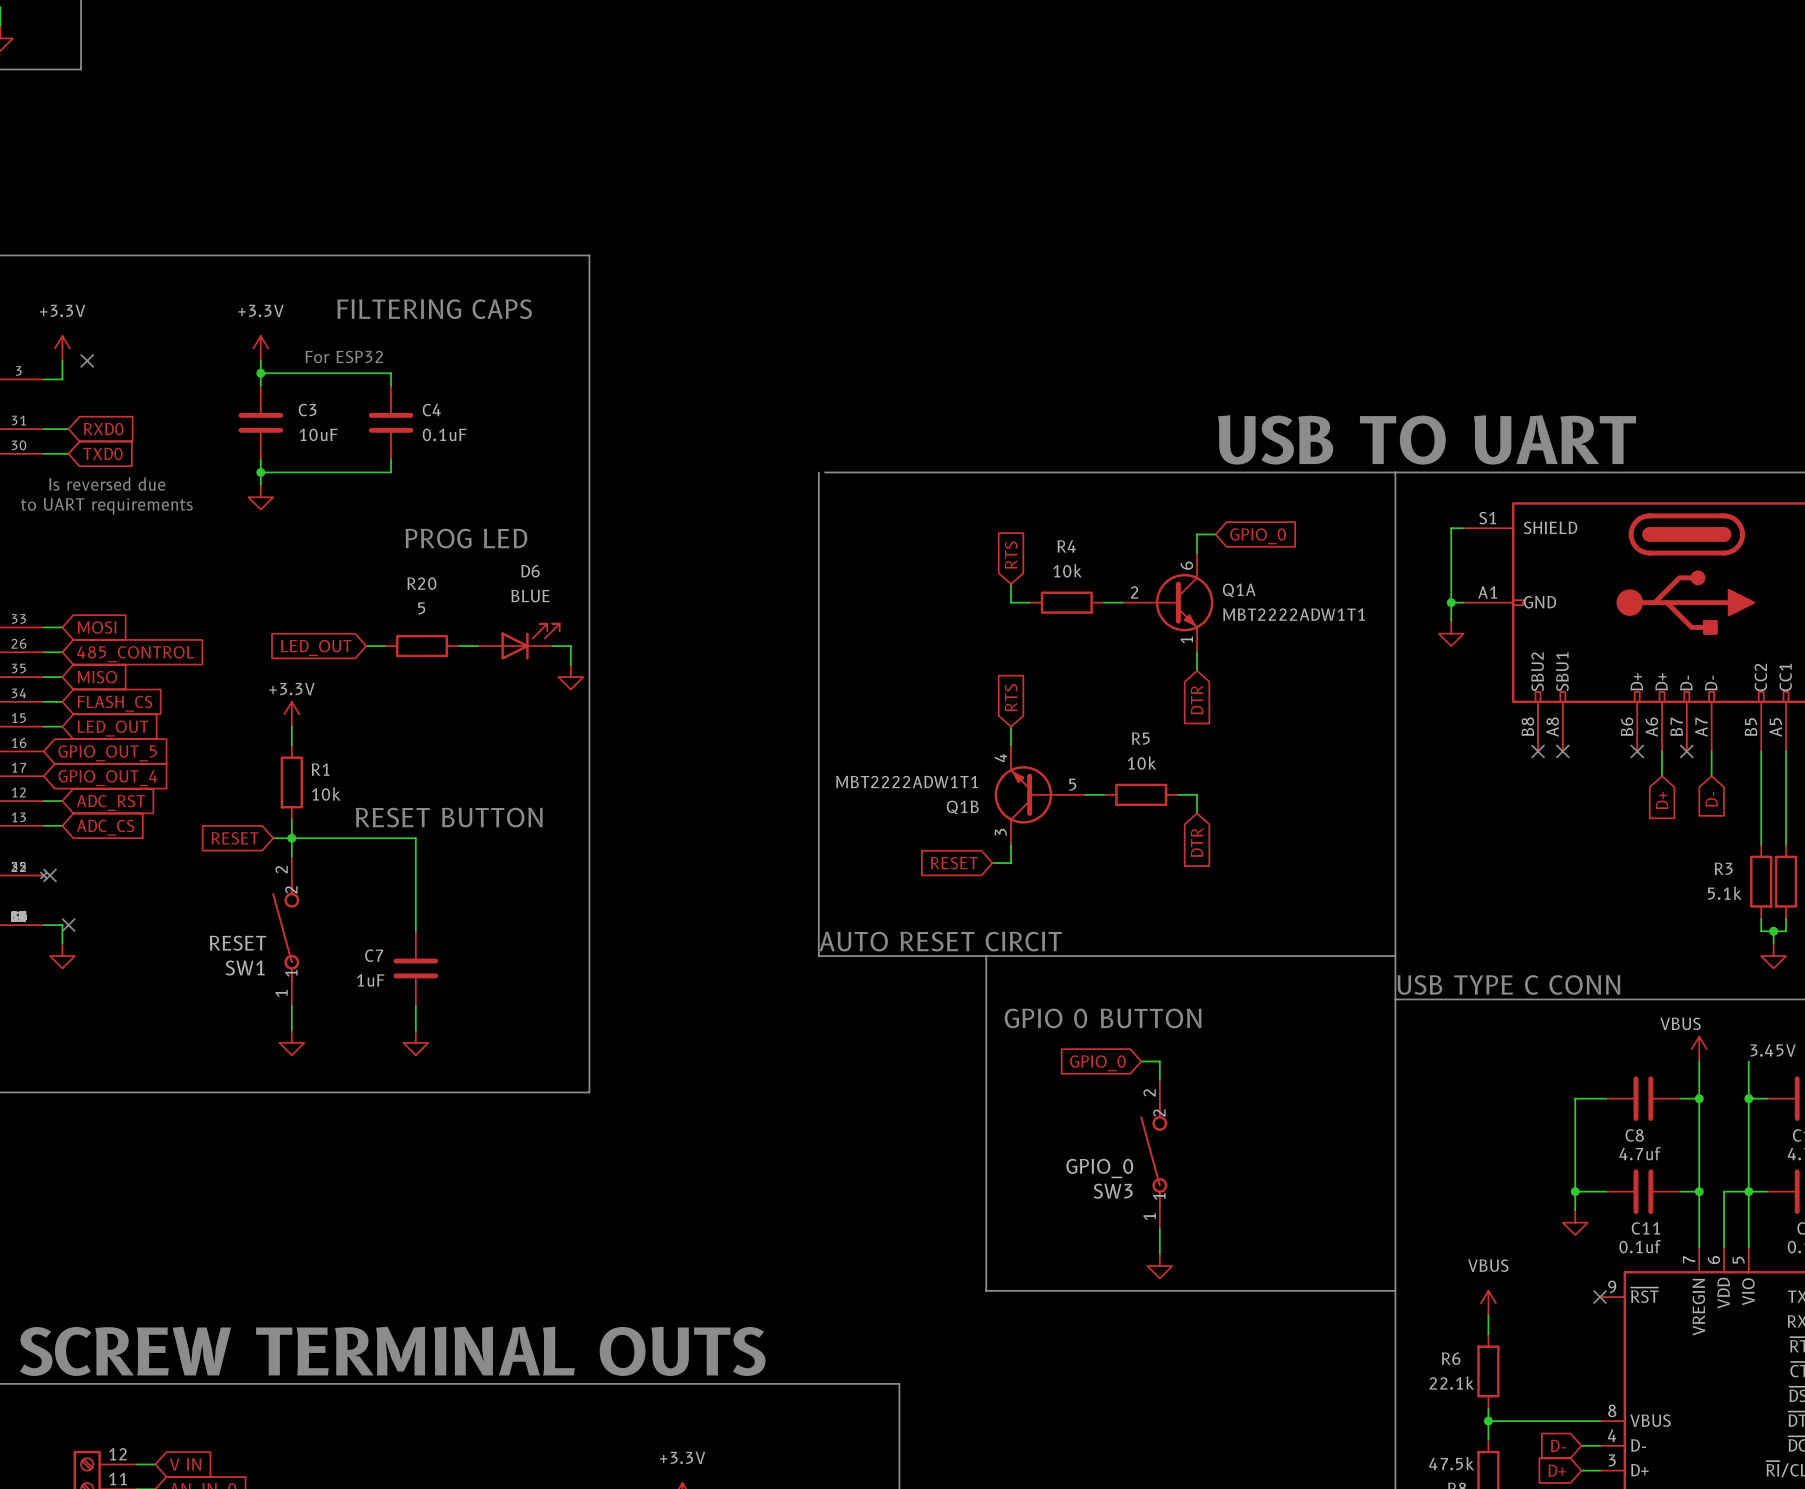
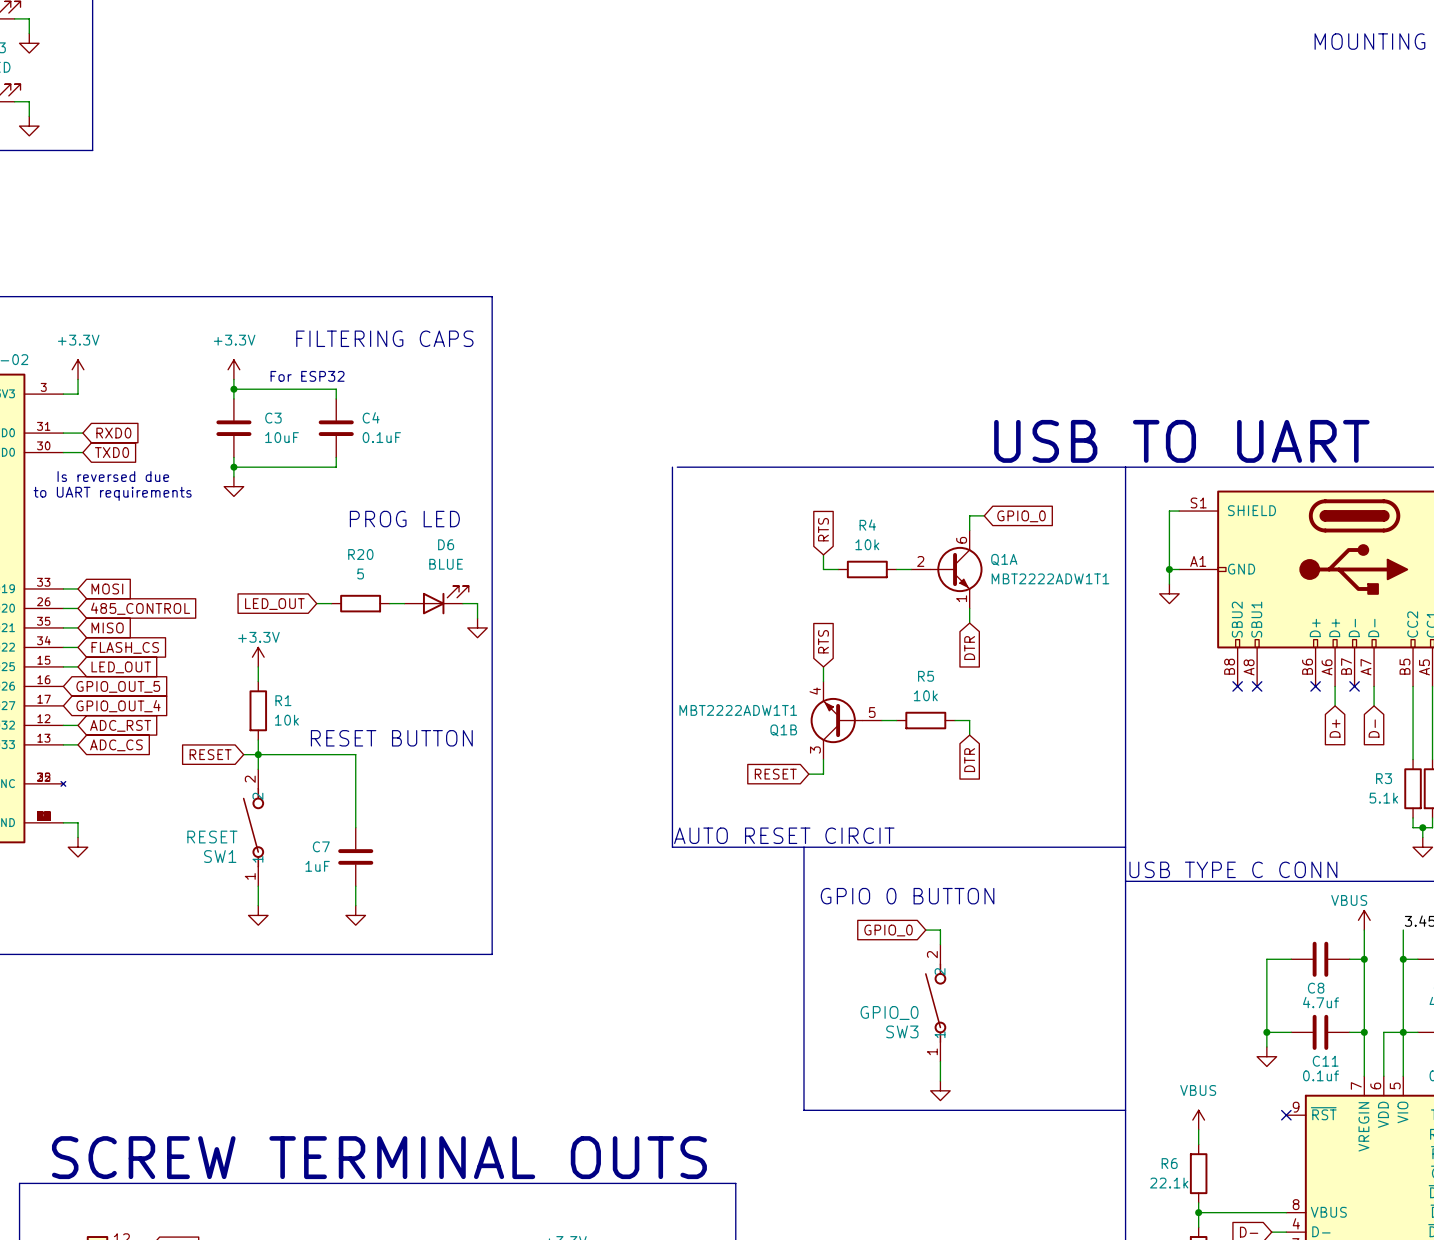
no-connect mark: (87, 360) -> none
no-connect mark: (50, 875) -> none
no-connect mark: (68, 925) -> none

